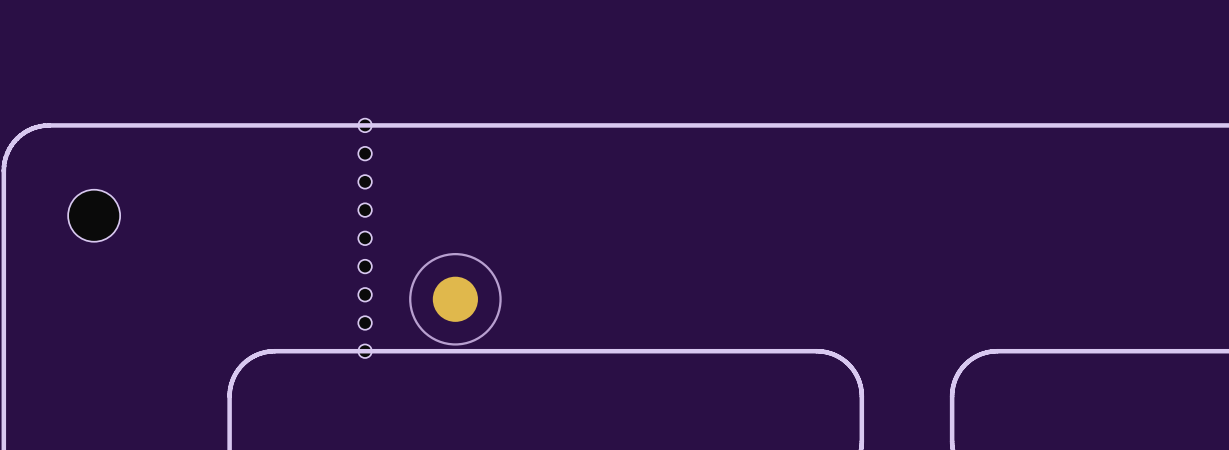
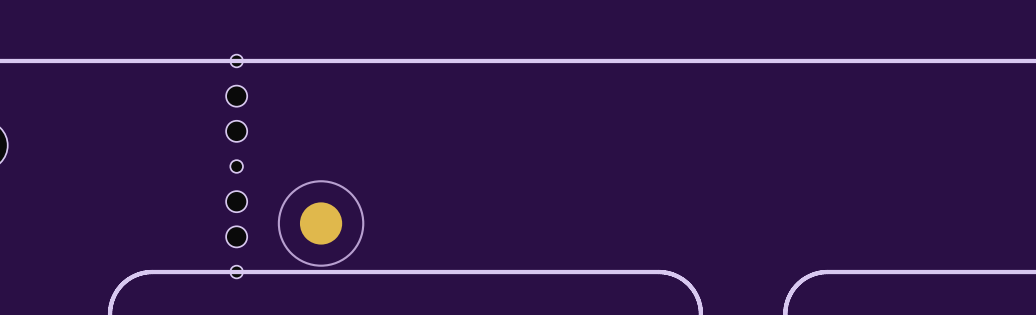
part: (365, 153) -> none
part: none -> (236, 96)
part: (365, 181) -> none
part: none -> (236, 131)
part: (365, 210) -> none
part: (365, 266) -> none
part: none -> (236, 201)
part: (365, 294) -> none
part: none -> (236, 236)
part: (365, 322) -> none

